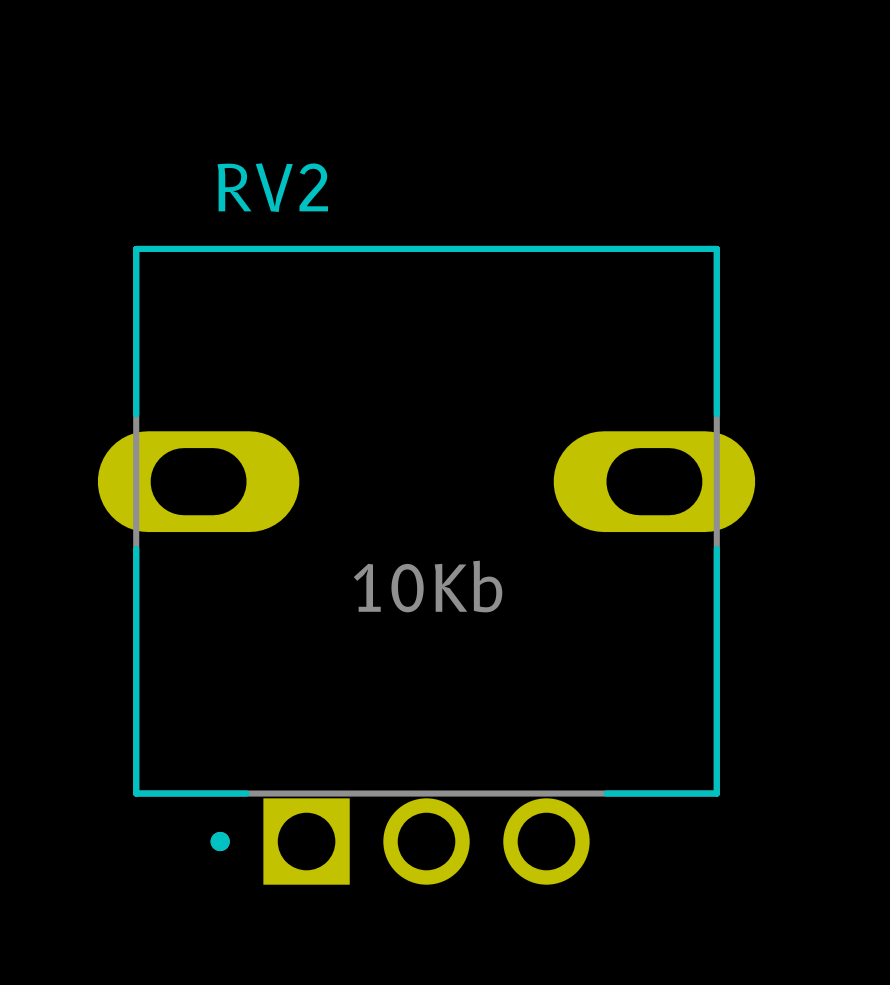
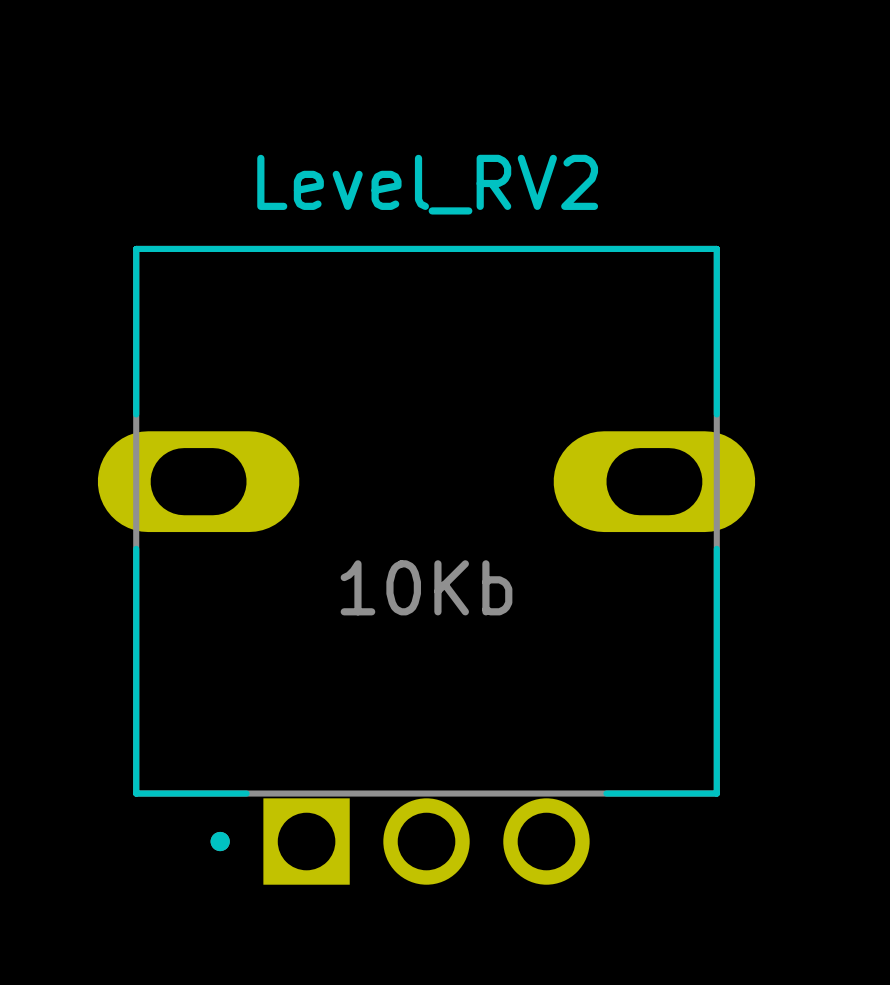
RV2 name: RV2 (272, 187) -> Level_RV2 (427, 184)

